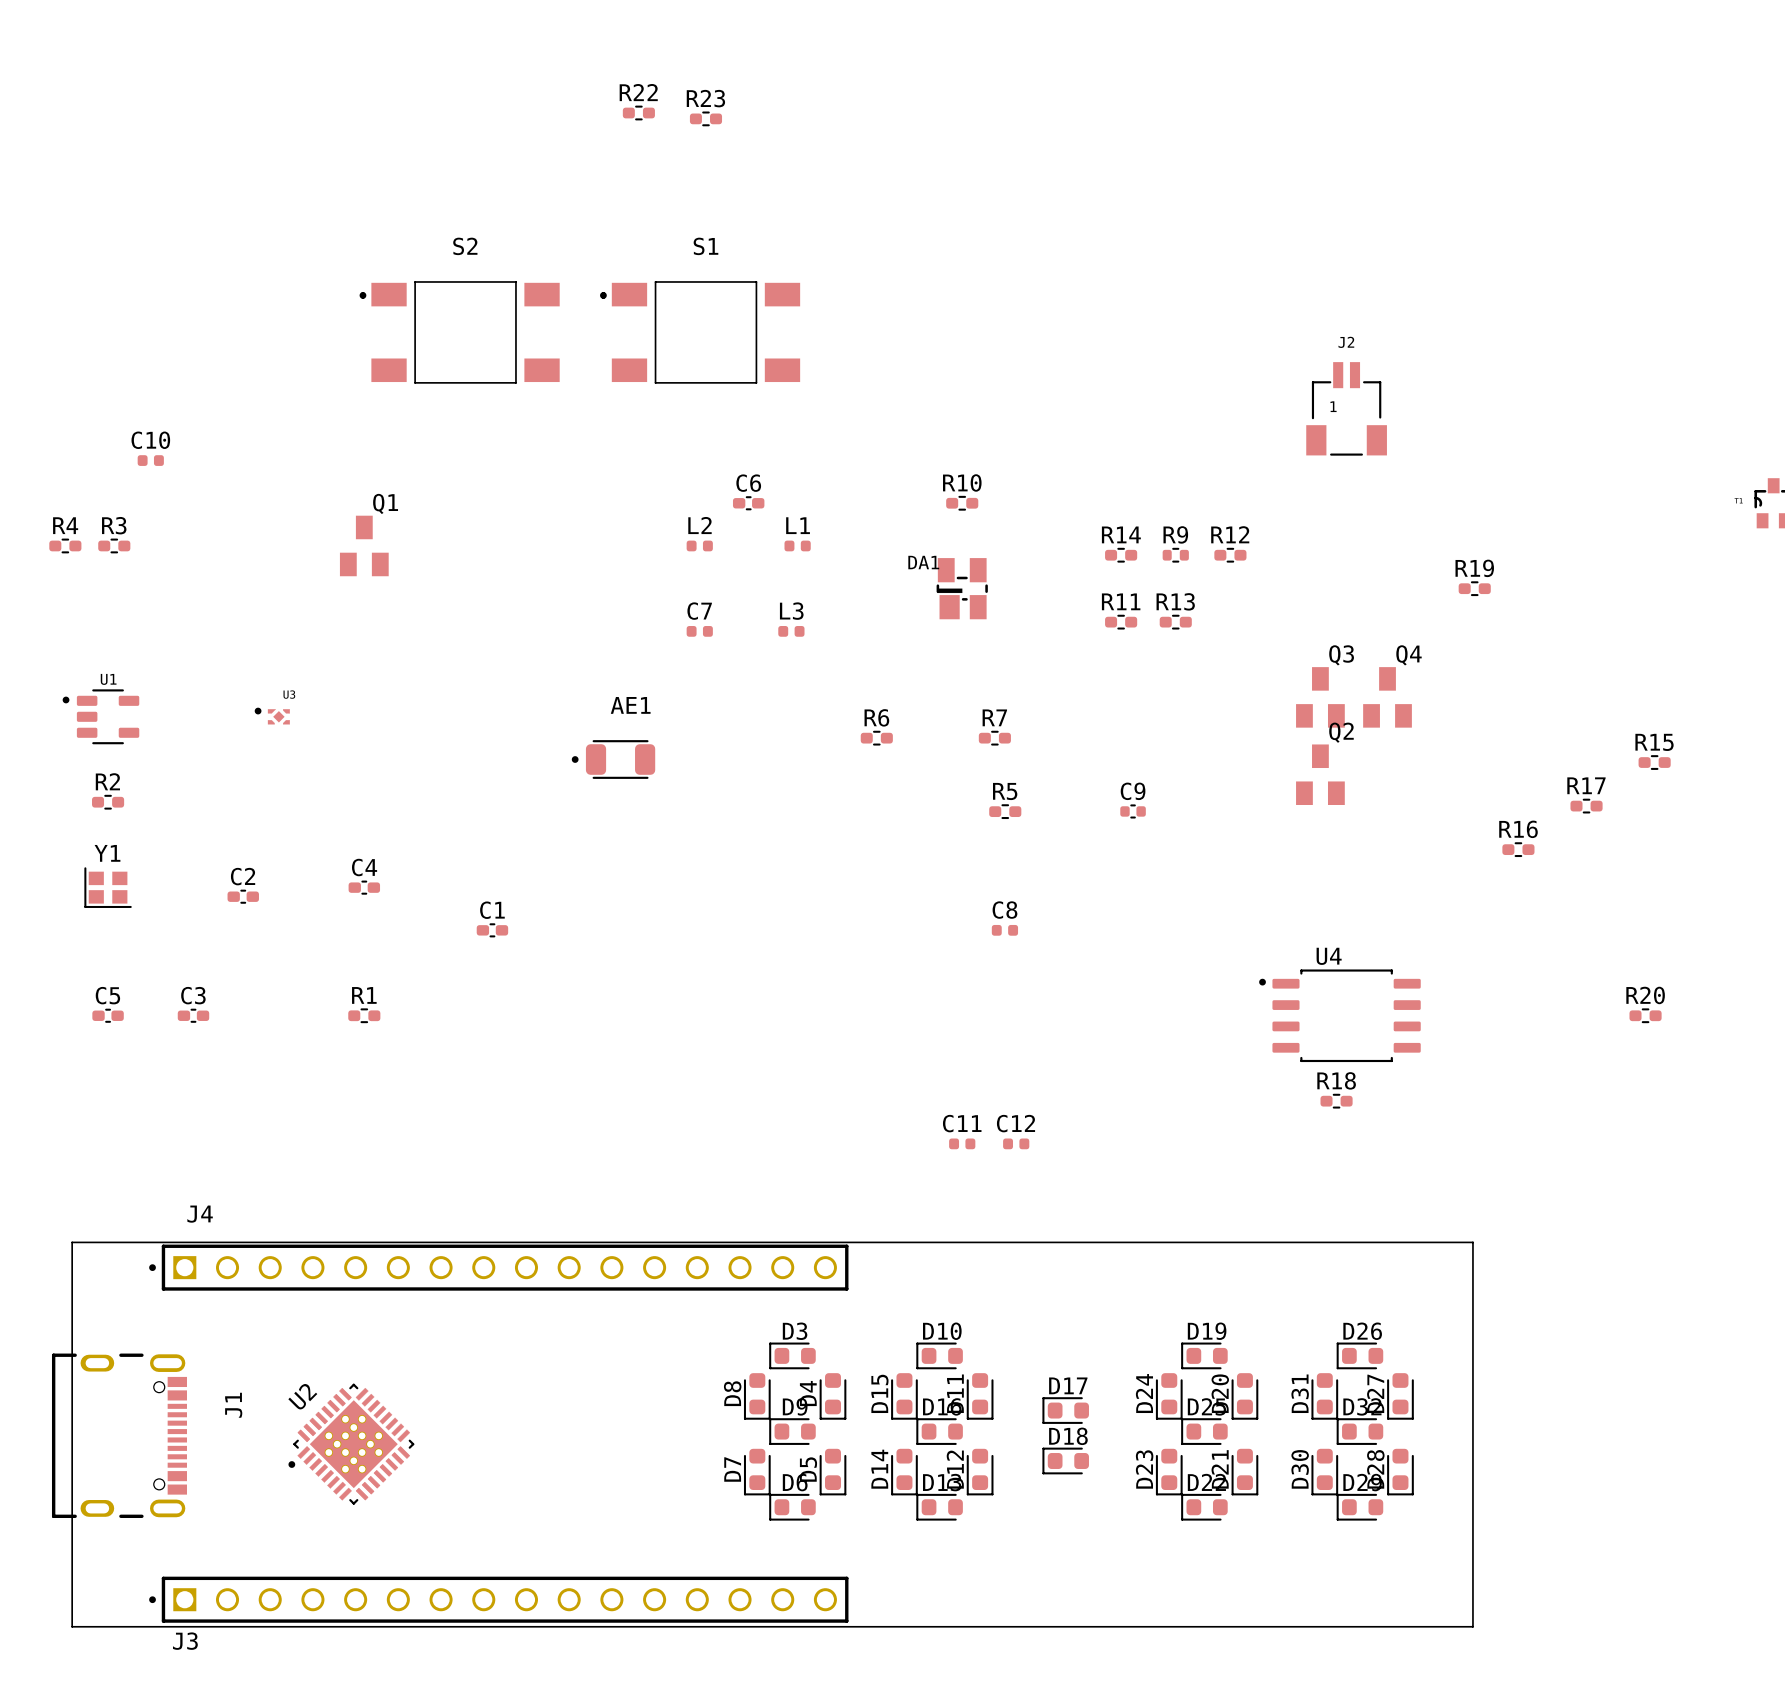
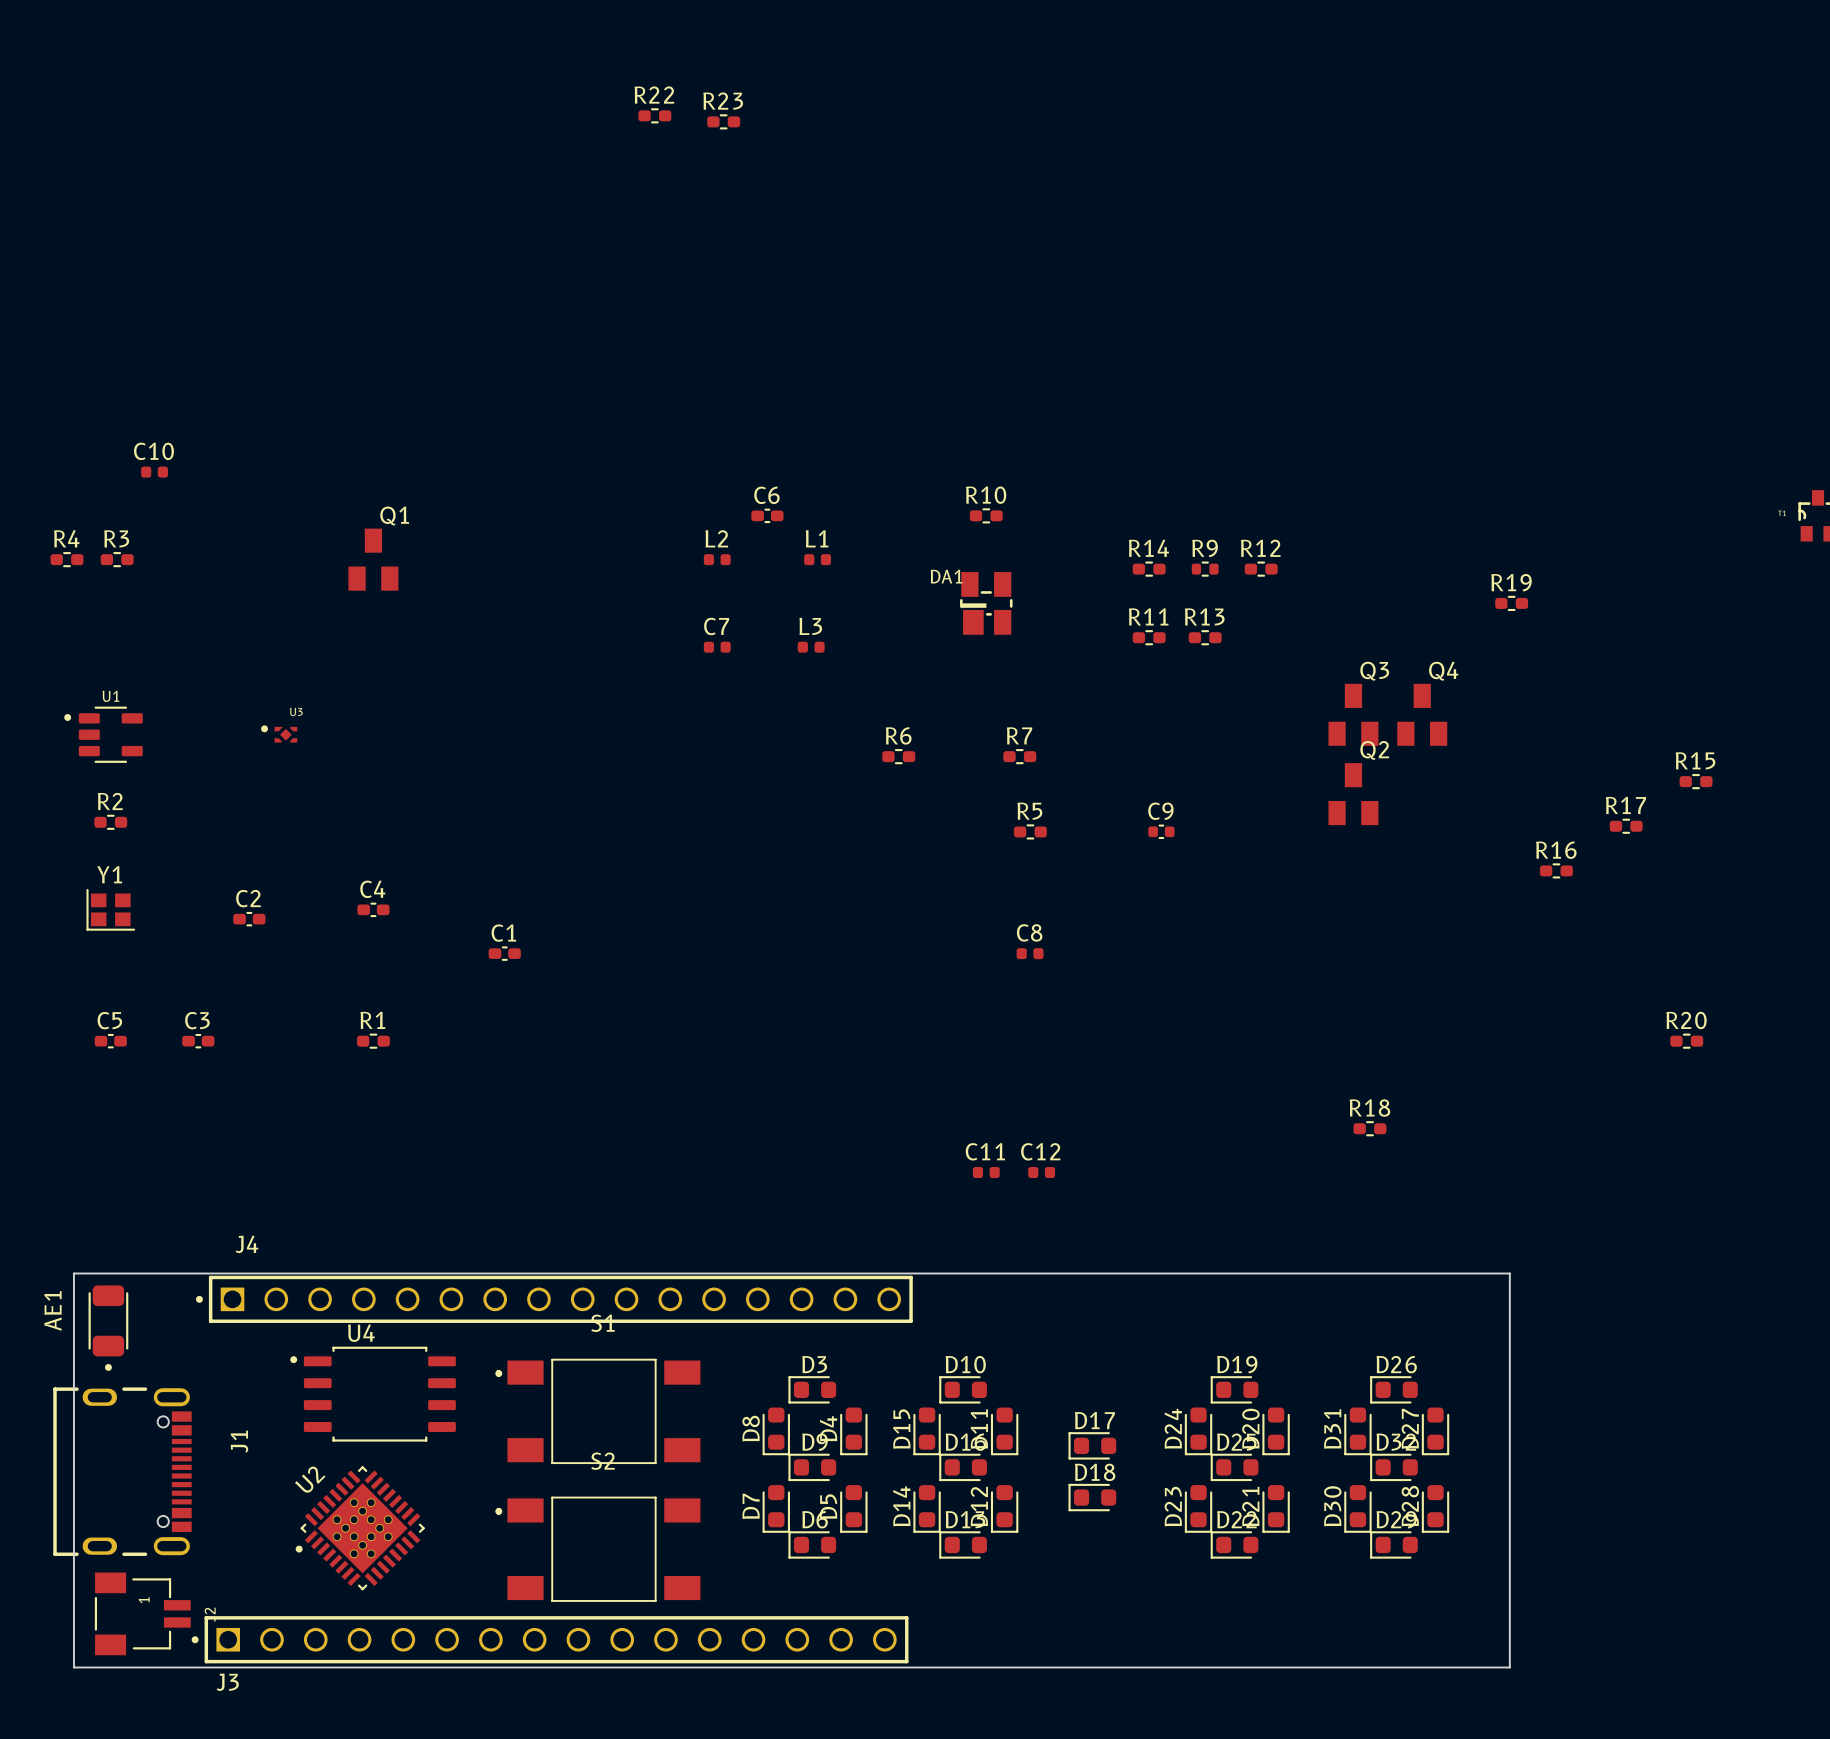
S2 position: (459, 332) -> (597, 1549)
S1 position: (700, 332) -> (597, 1411)
J2 rotation: 0° (1346, 408) -> 90° clockwise (142, 1613)
J2 position: (1346, 408) -> (142, 1613)
AE1 rotation: 0° (613, 759) -> 90° counterclockwise (108, 1328)
AE1 position: (613, 759) -> (108, 1328)
U4 position: (1339, 1015) -> (373, 1394)
J4 position: (498, 1267) -> (554, 1299)
U2 position: (351, 1444) -> (360, 1528)
J3 position: (498, 1599) -> (550, 1639)

